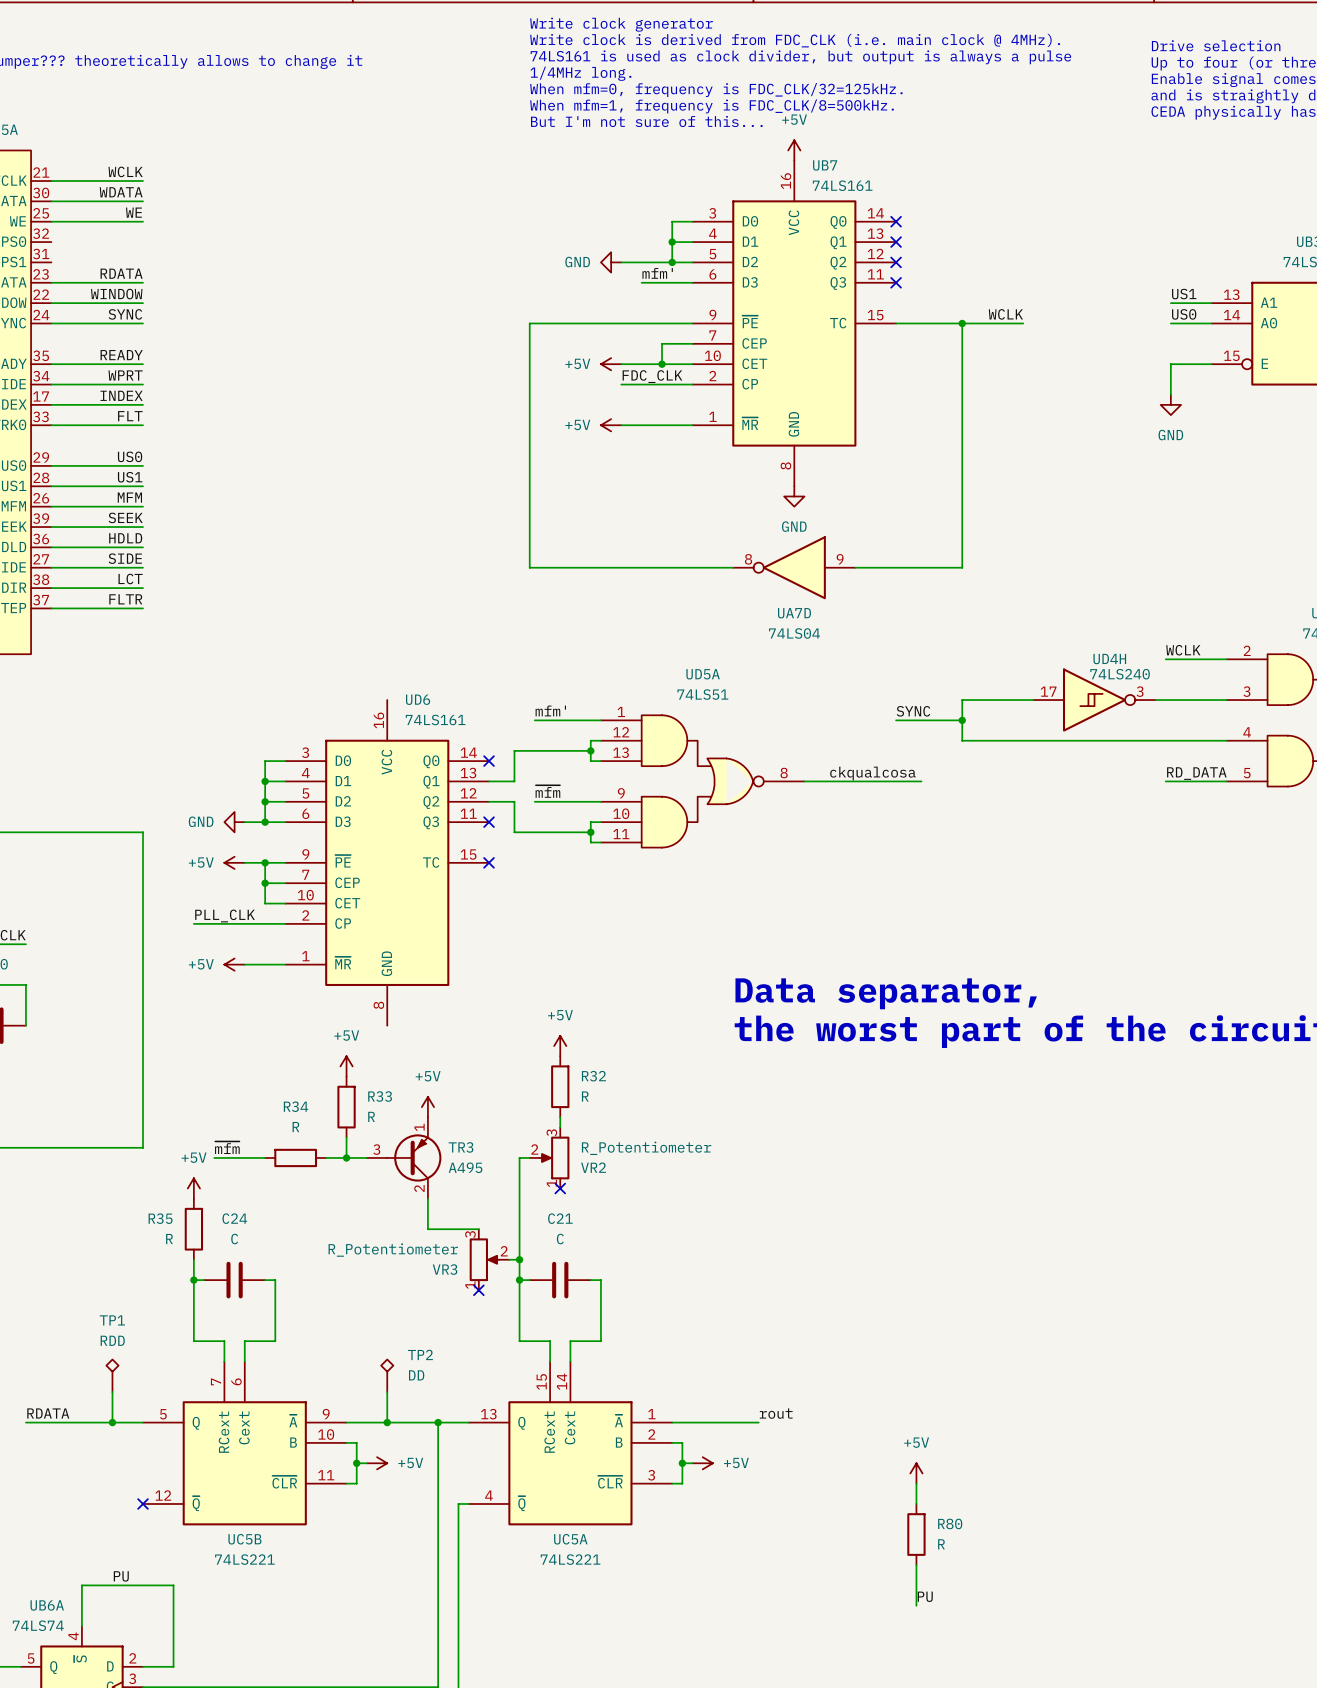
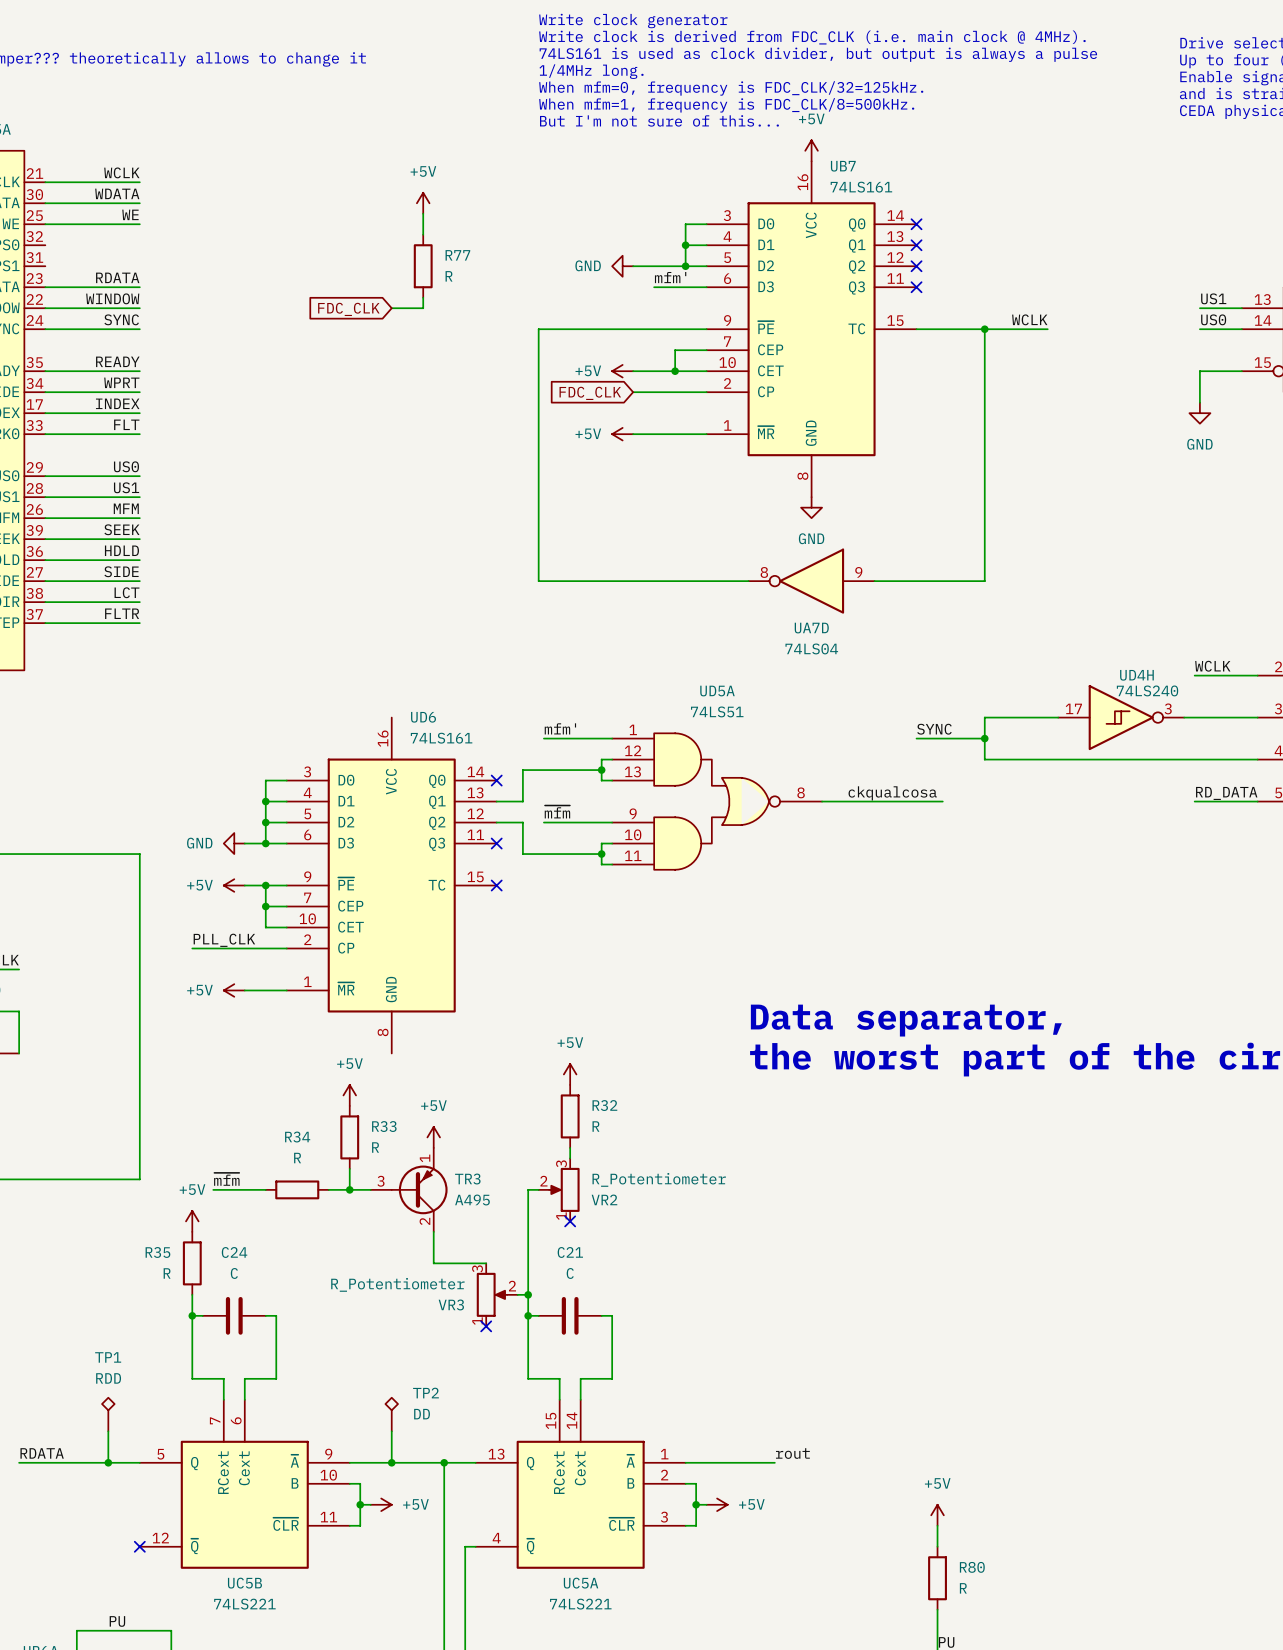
power symbol: none -> +5V (423, 203)
wire: none -> (423, 213) (423, 234)
R77: none -> R (423, 266)
wire: none -> (423, 297) (423, 308) (391, 308)
global label: none -> FDC_CLK (348, 309)
label: FDC_CLK (652, 376) -> none
global label: none -> FDC_CLK (590, 393)

